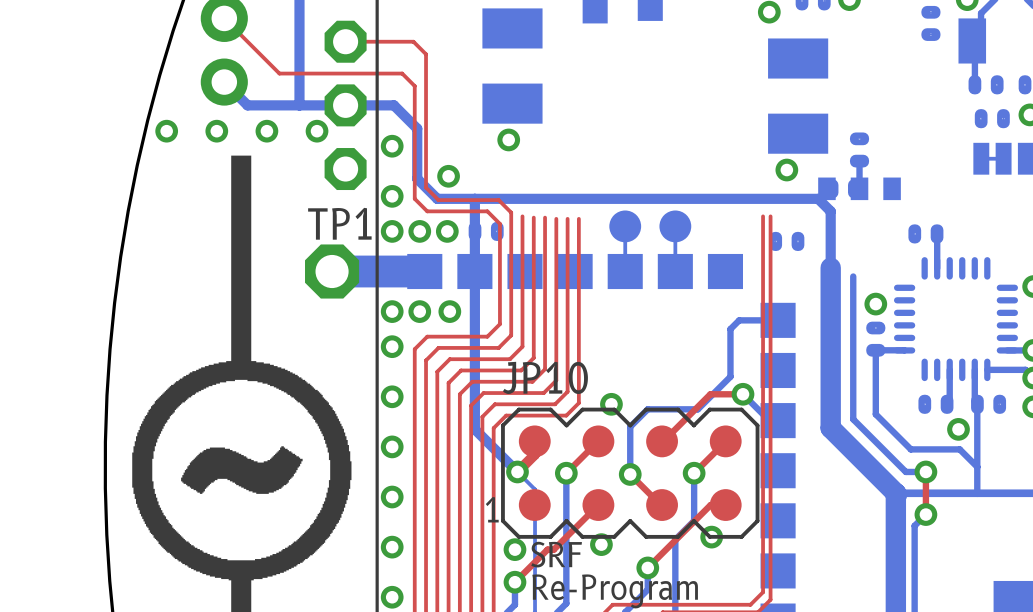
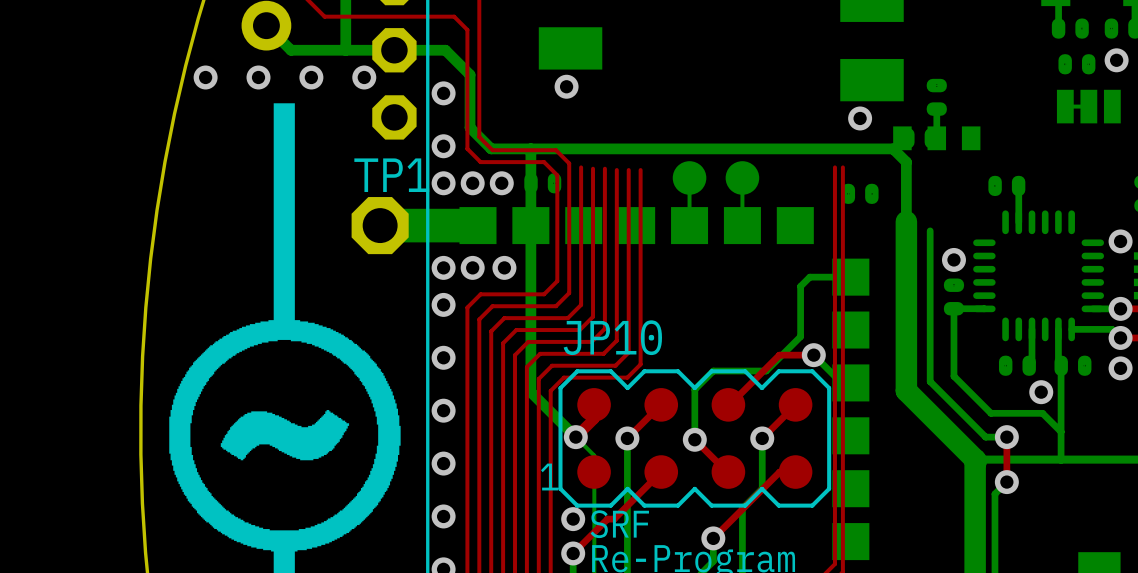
via: (448, 176) -> none
via: (611, 404) -> none
via: (711, 537) -> none
via: (601, 544) -> none

